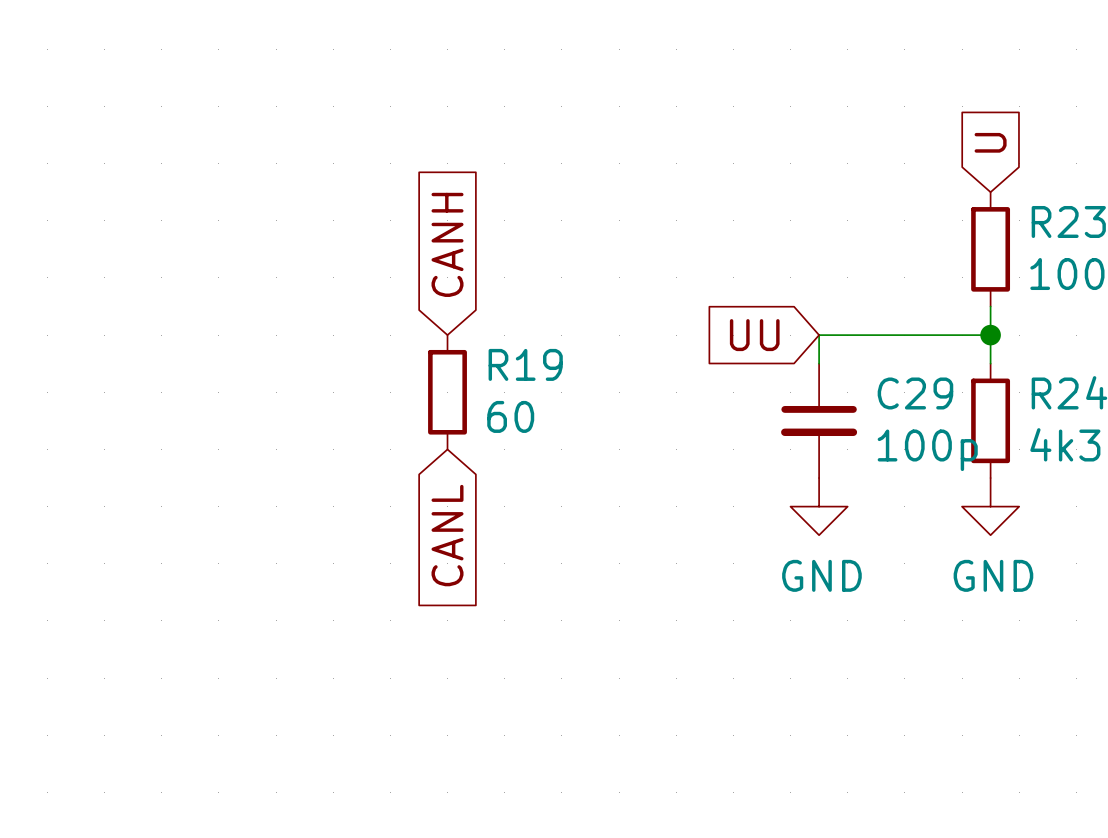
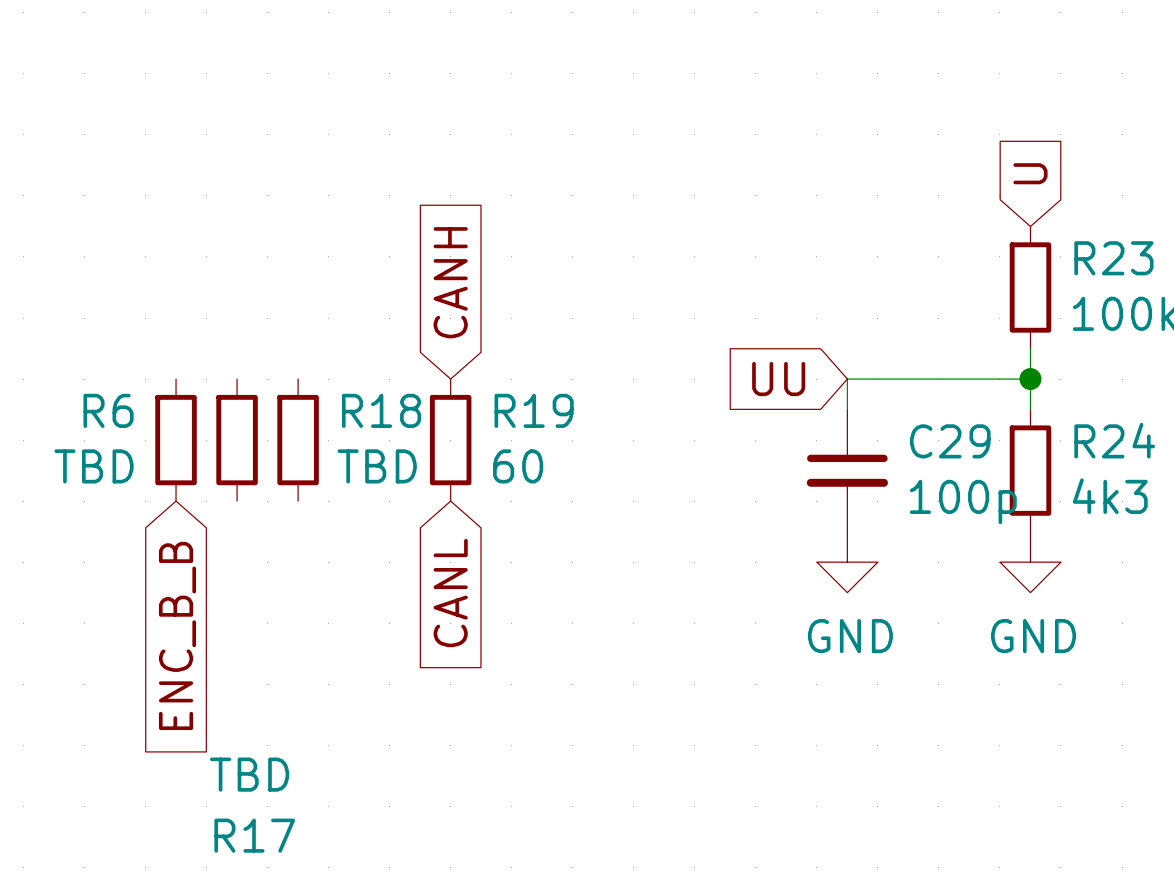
R6: none -> TBD (176, 440)
R17: none -> TBD (237, 440)
R18: none -> TBD (298, 440)
global label: none -> ENC_B_B (177, 635)

